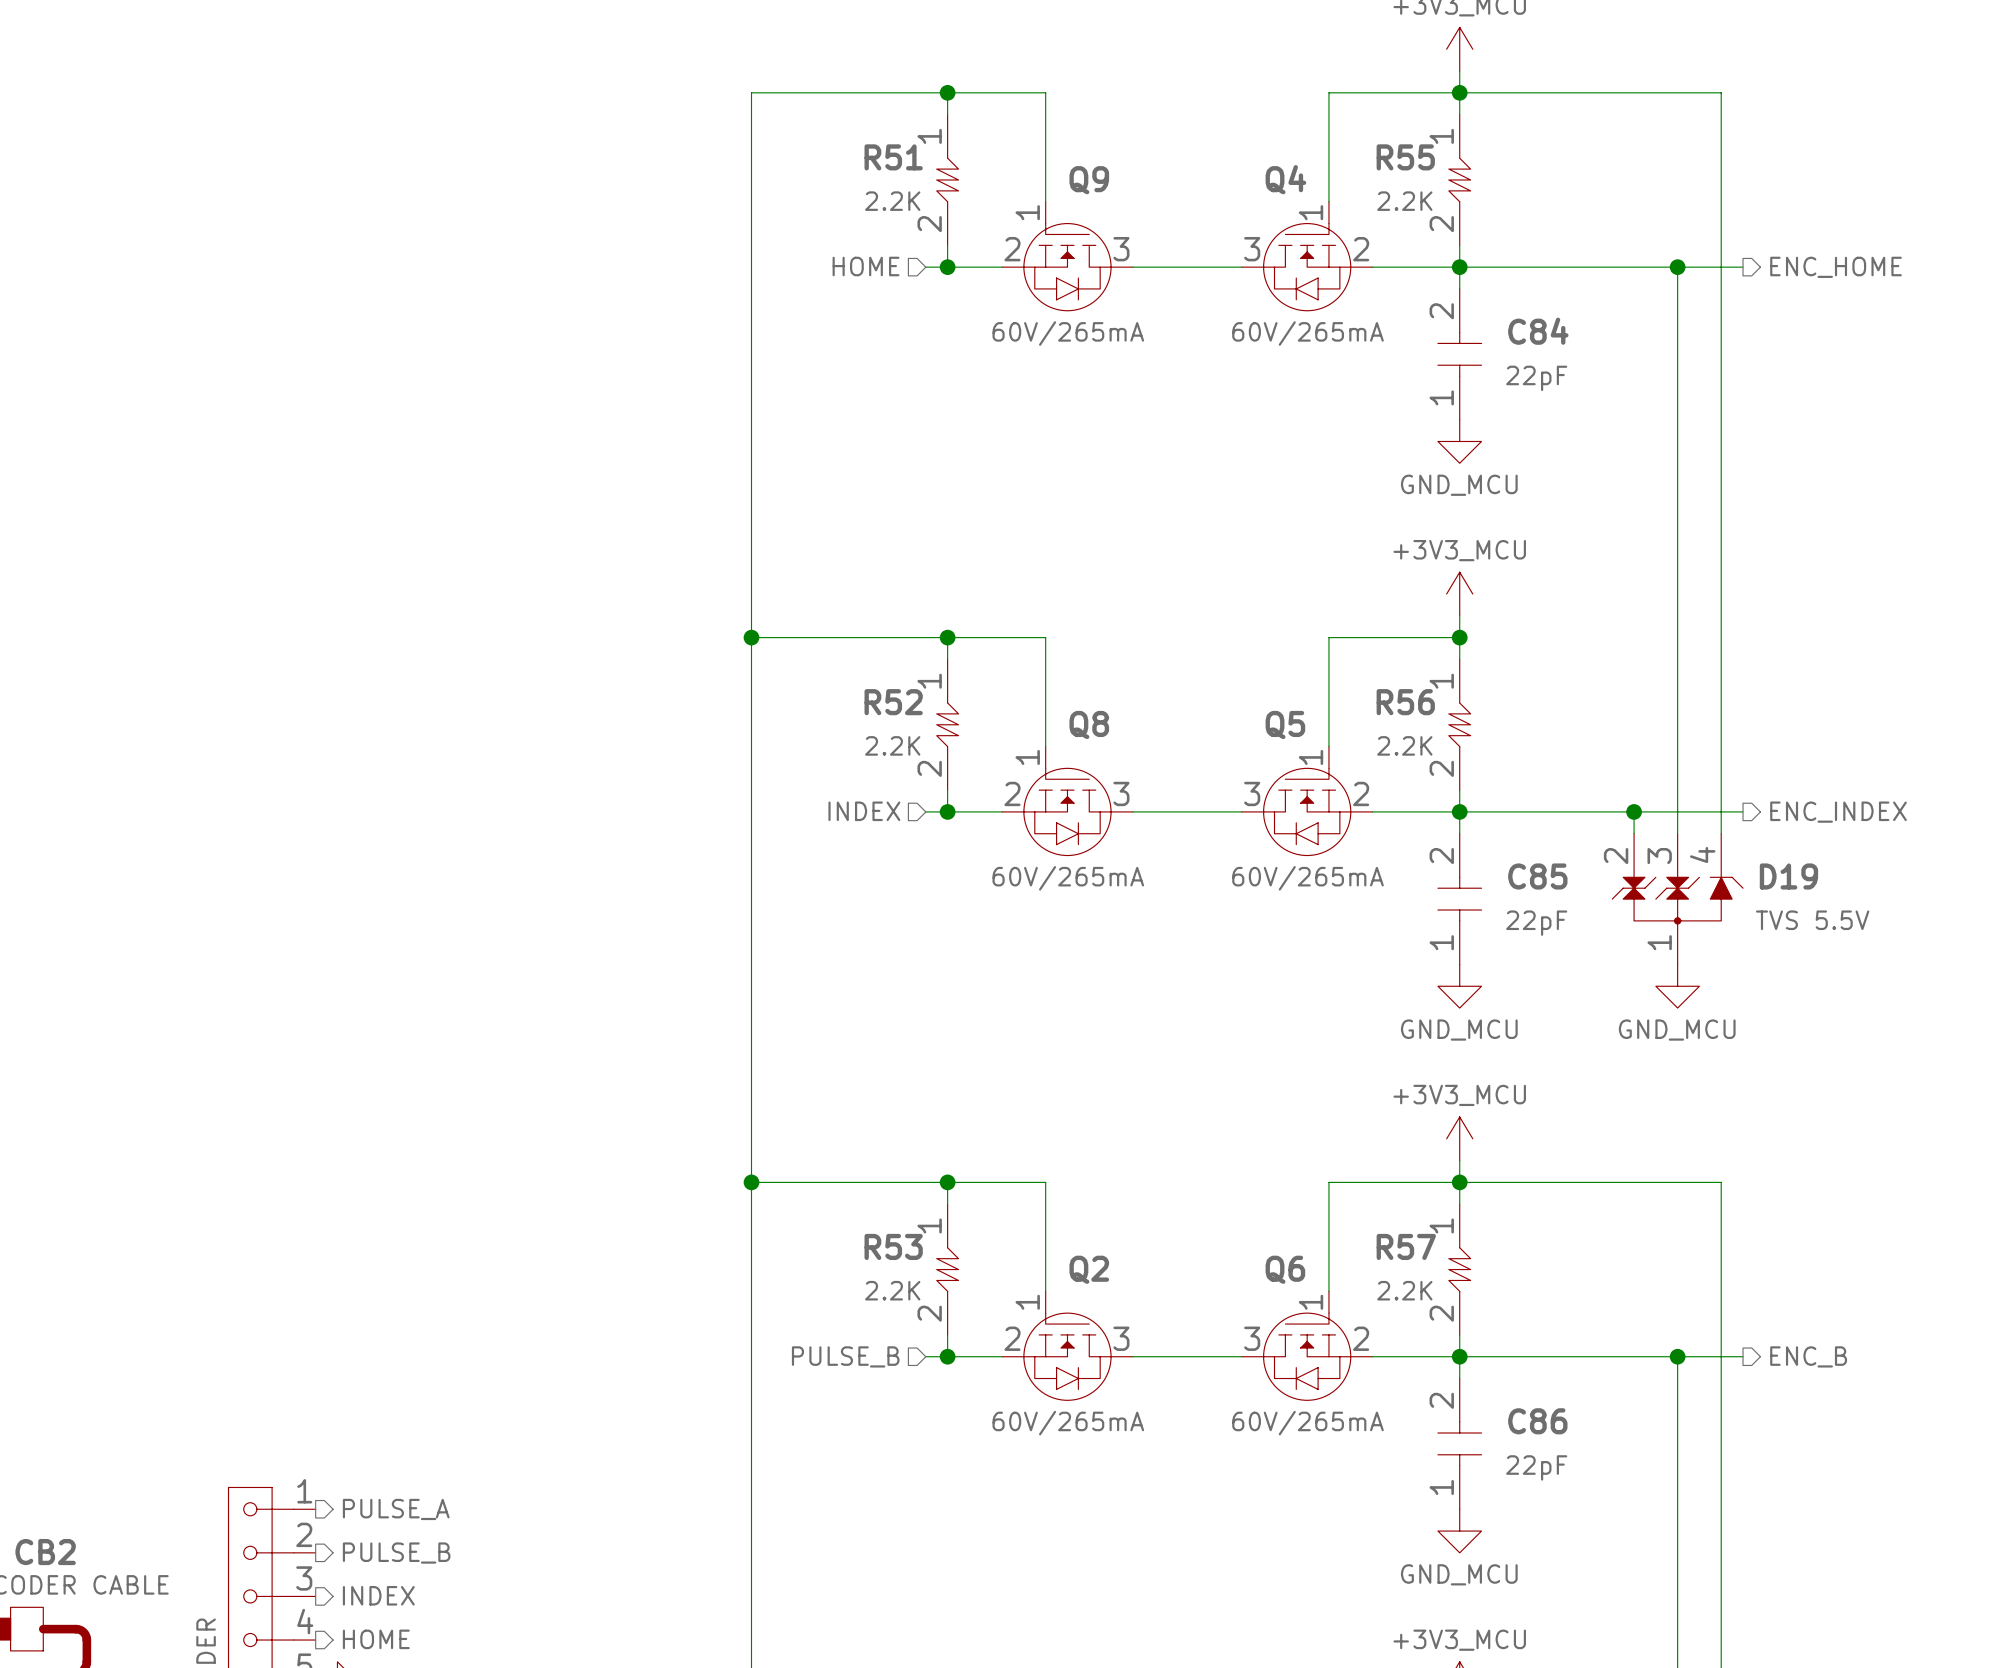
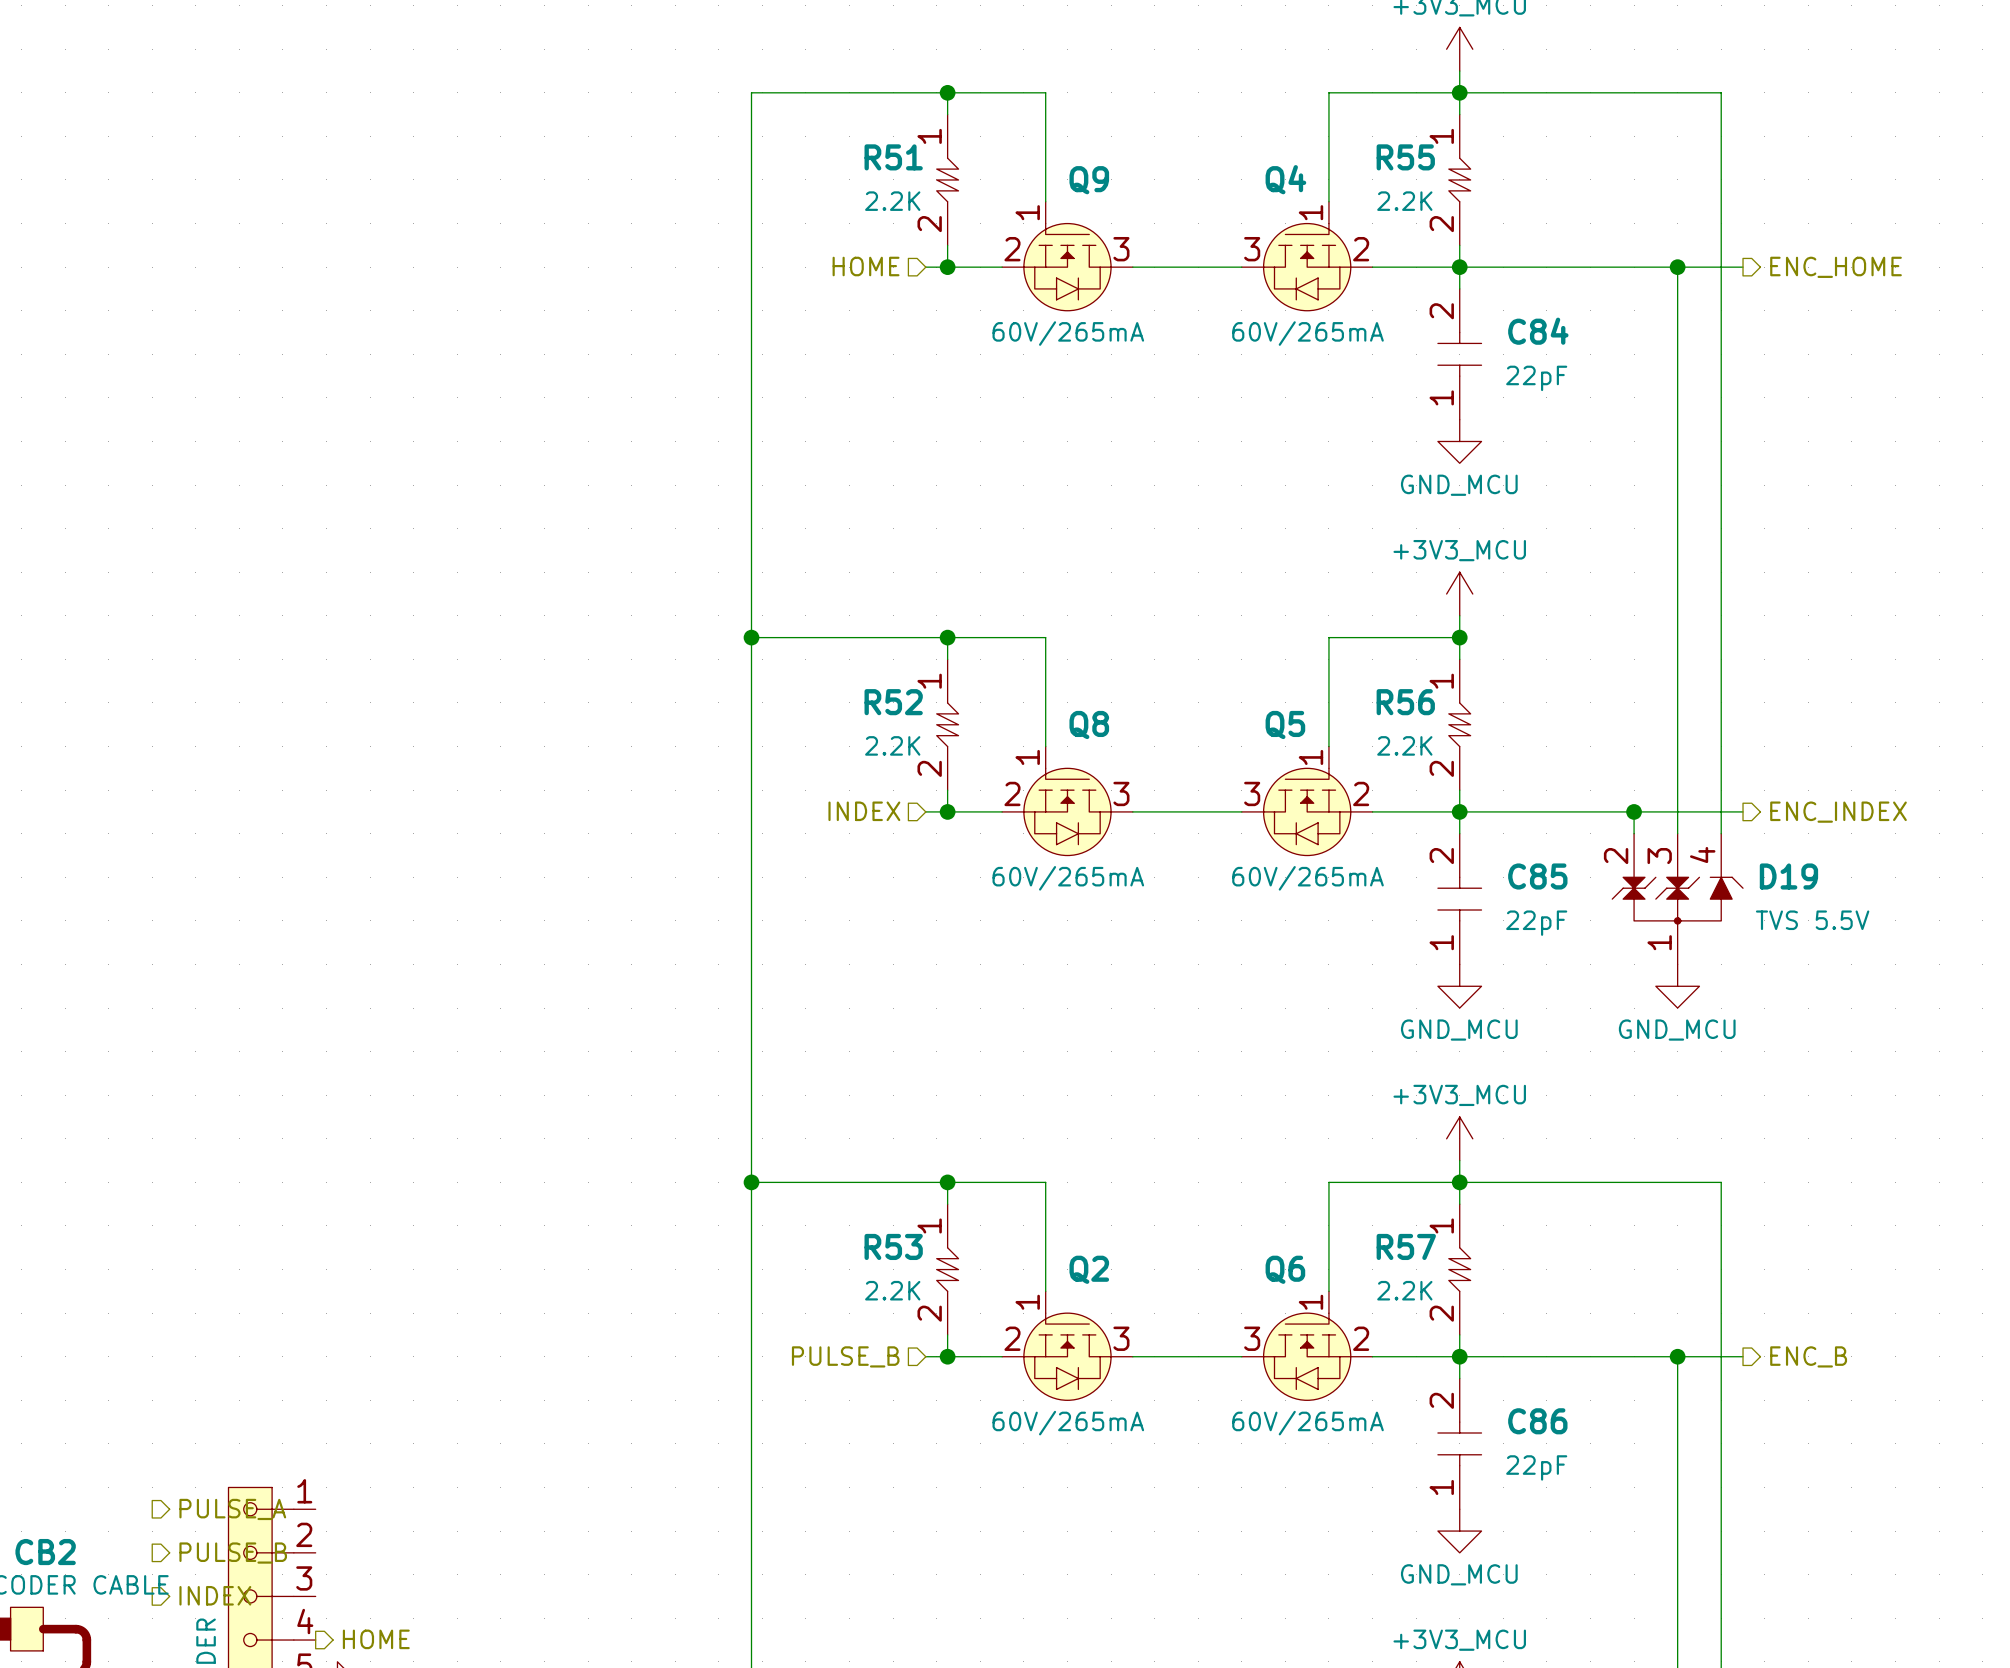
hierarchical label position: PULSE_A (396, 1509) -> PULSE_A (232, 1509)
hierarchical label position: PULSE_B (396, 1553) -> PULSE_B (233, 1553)
hierarchical label position: INDEX (378, 1595) -> INDEX (215, 1595)

